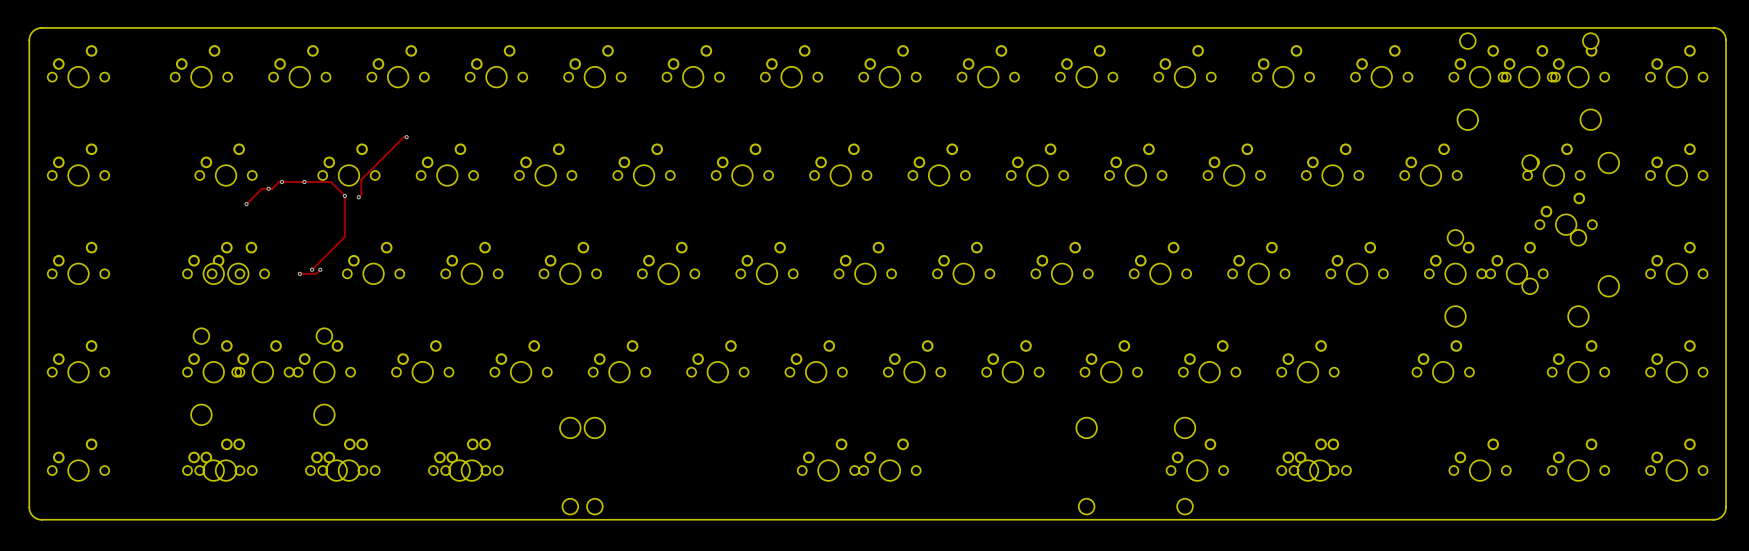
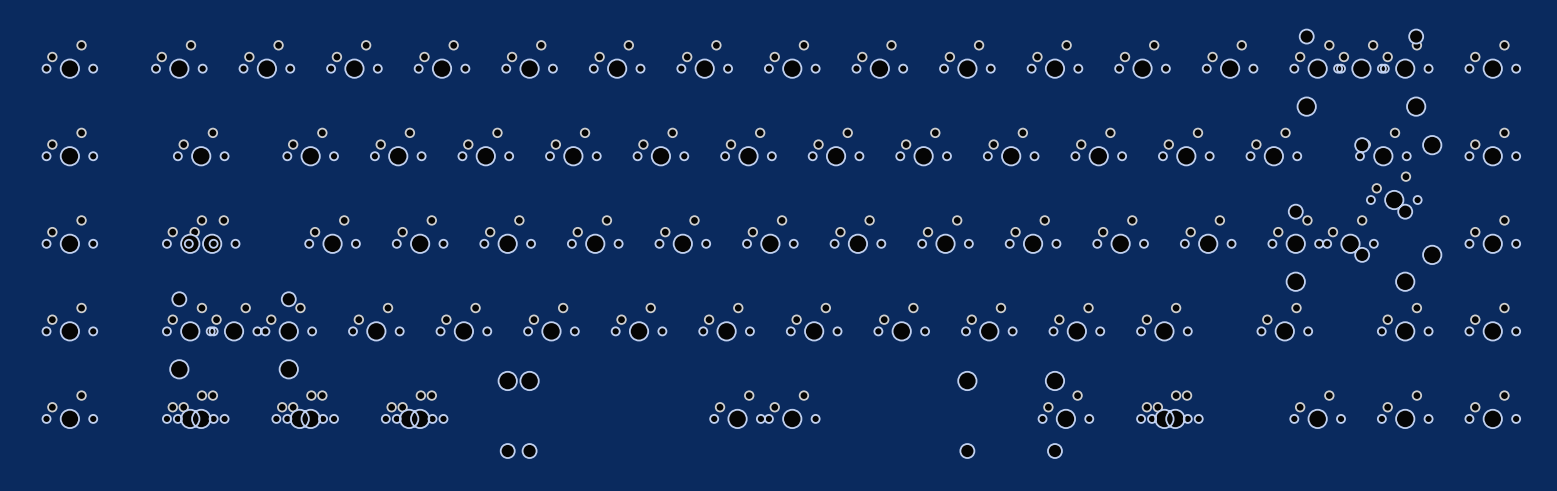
board edge: (41, 27) (1716, 28) (1723, 32) (1725, 40) (1725, 510) (1721, 517) (1713, 519) (38, 519) (31, 514) (29, 507) (29, 40) (32, 31) (41, 27) -> none
track: (406, 137) (403, 137) (361, 179) (361, 194) (358, 197) -> none
via: (406, 137) -> none
via: (304, 181) -> none
via: (281, 182) -> none
via: (268, 188) -> none
via: (344, 195) -> none
via: (358, 197) -> none
track: (246, 204) (261, 188) (272, 188) (279, 182) (330, 182) (344, 195) (344, 236) (312, 269) -> none
via: (246, 204) -> none
via: (312, 269) -> none
track: (320, 269) (316, 273) (299, 273) -> none
via: (320, 269) -> none
via: (299, 273) -> none

